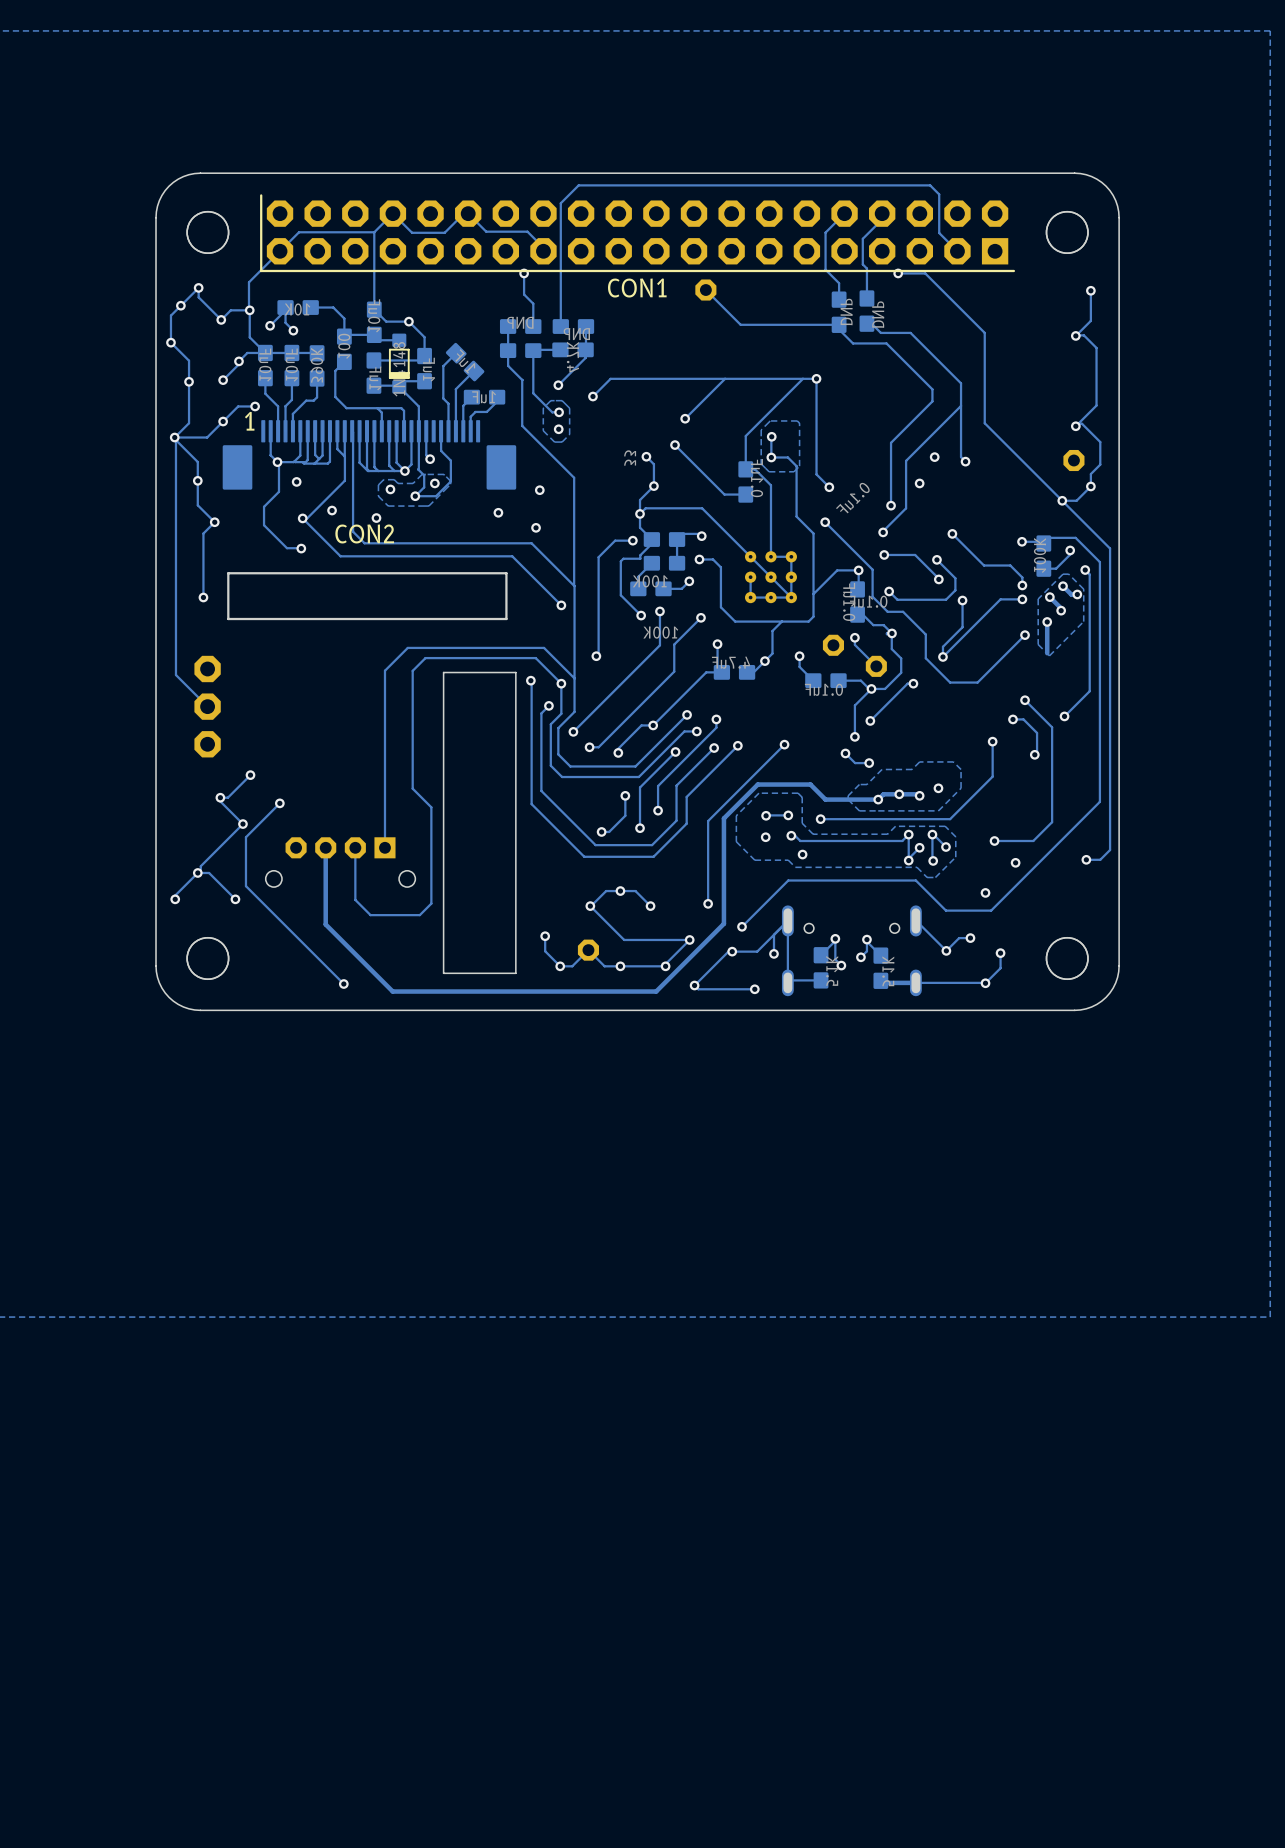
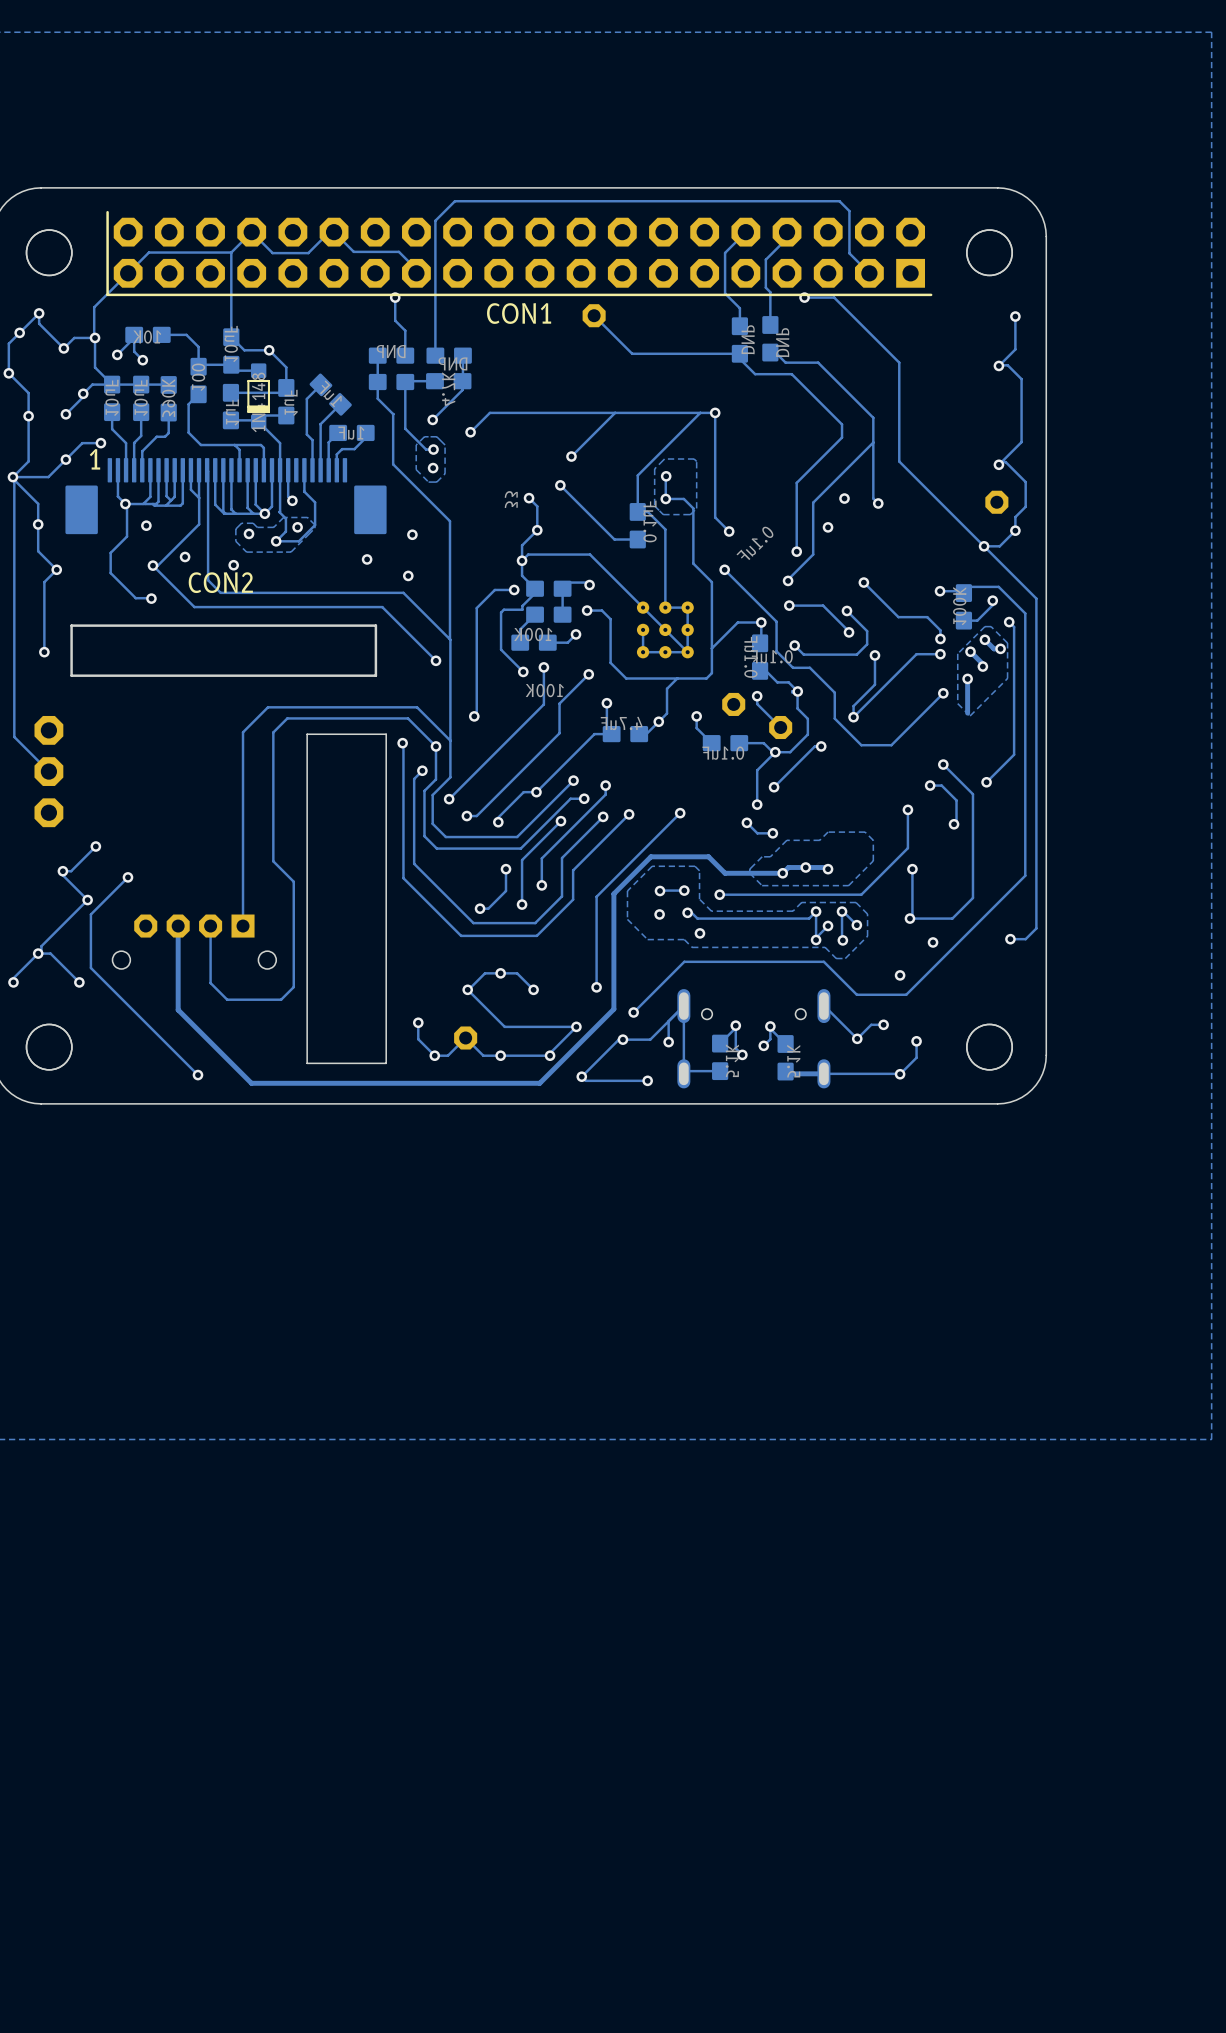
via position: (938, 788) -> (912, 869)
track: none -> (912, 869) (912, 918)

